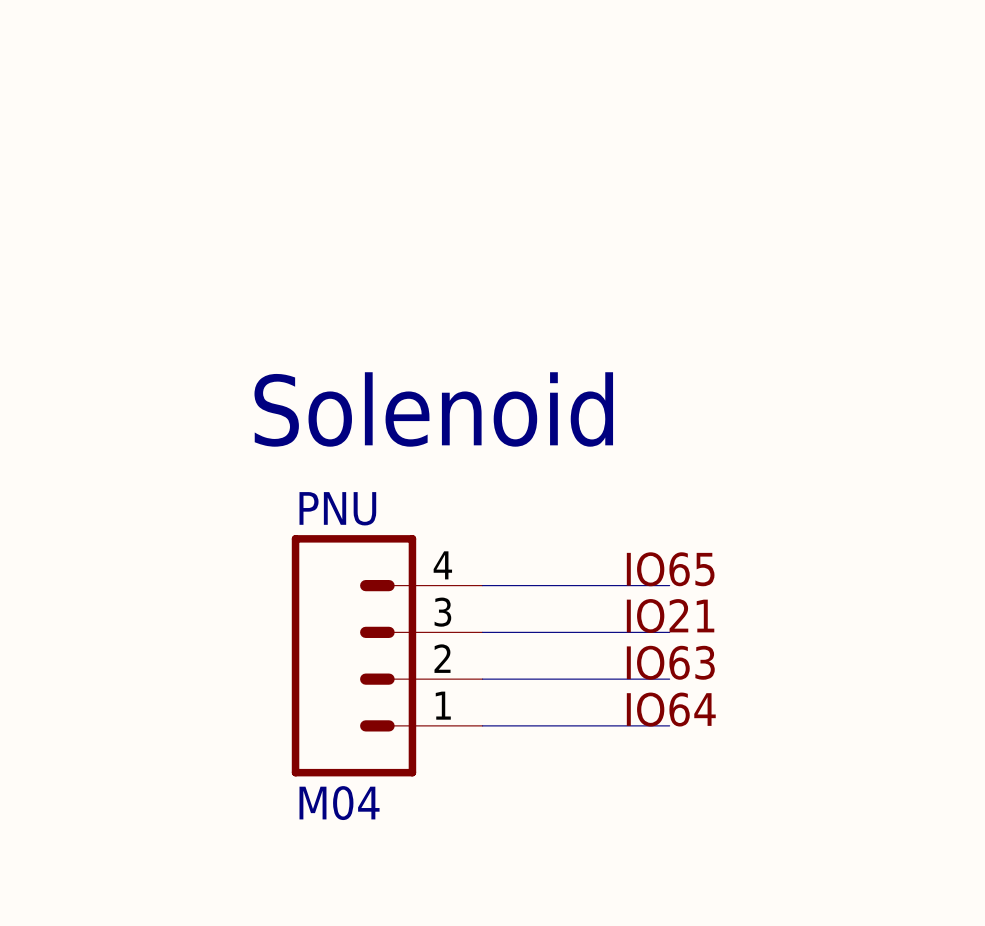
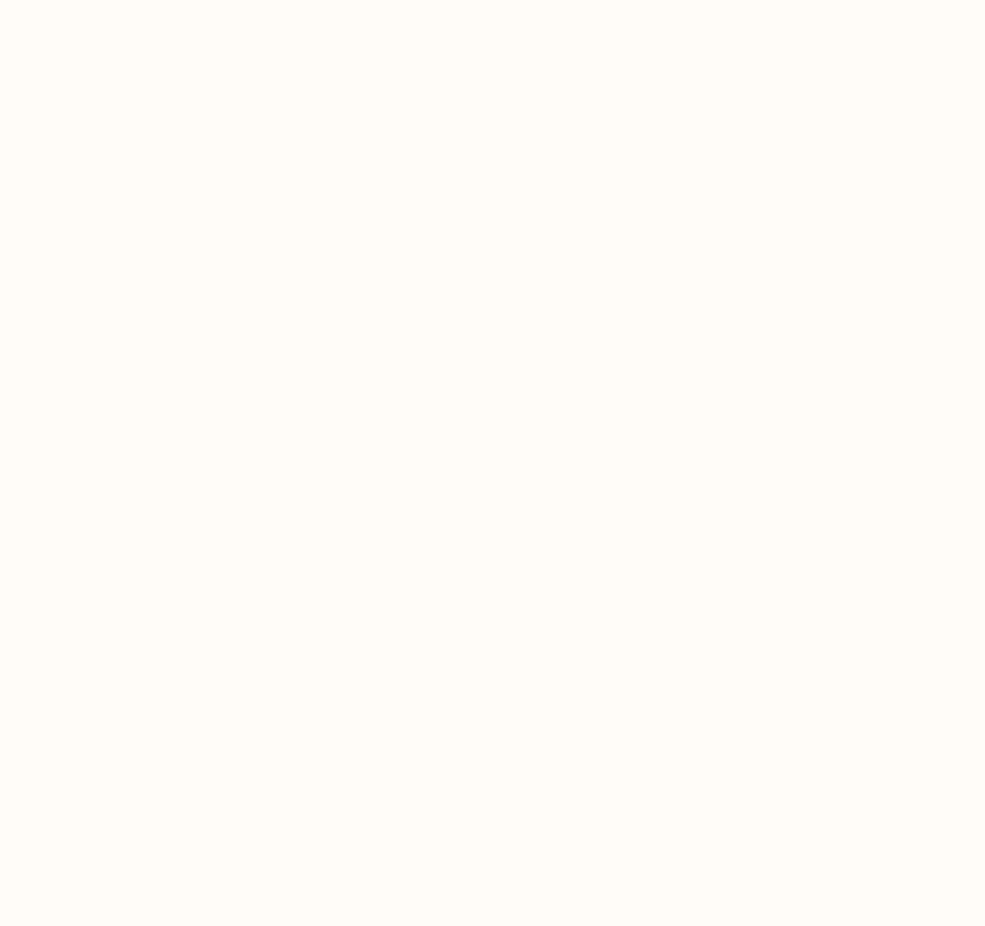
text: Solenoid (433, 409) -> none
label: IO65 (670, 569) -> none
wire: (482, 585) (669, 585) -> none
label: IO21 (670, 616) -> none
wire: (482, 632) (669, 632) -> none
PNU: M04 (387, 655) -> none
label: IO63 (670, 662) -> none
wire: (482, 679) (669, 679) -> none
label: IO64 (671, 709) -> none
wire: (482, 725) (669, 725) -> none

